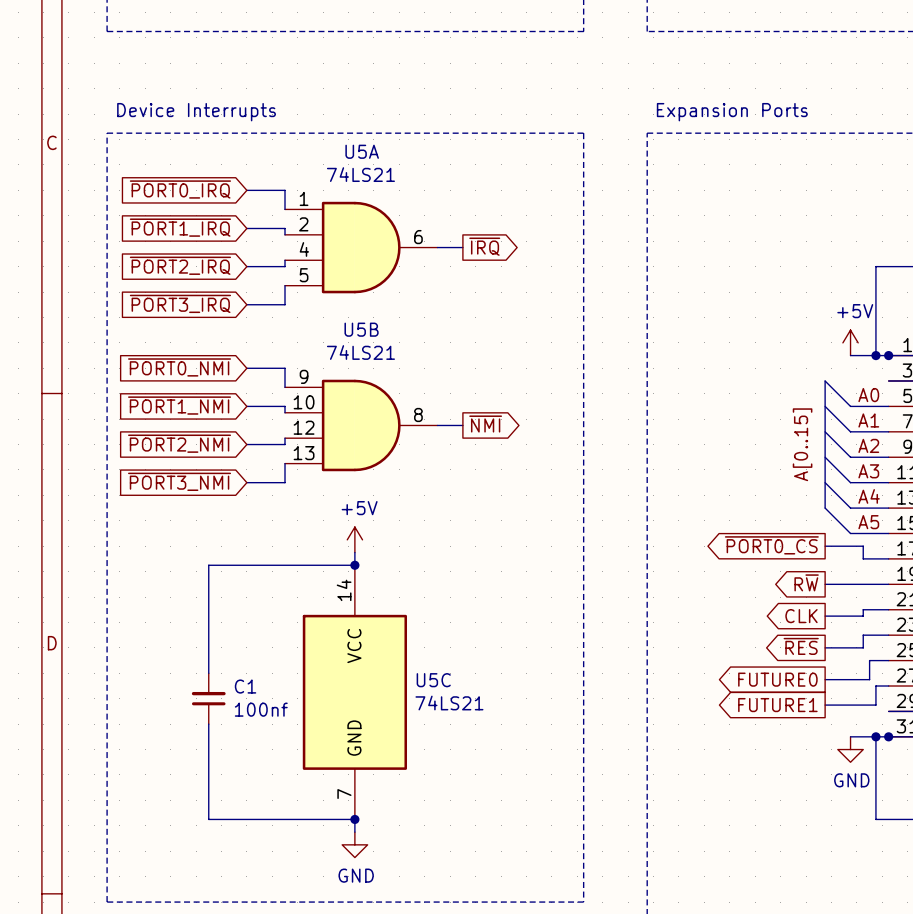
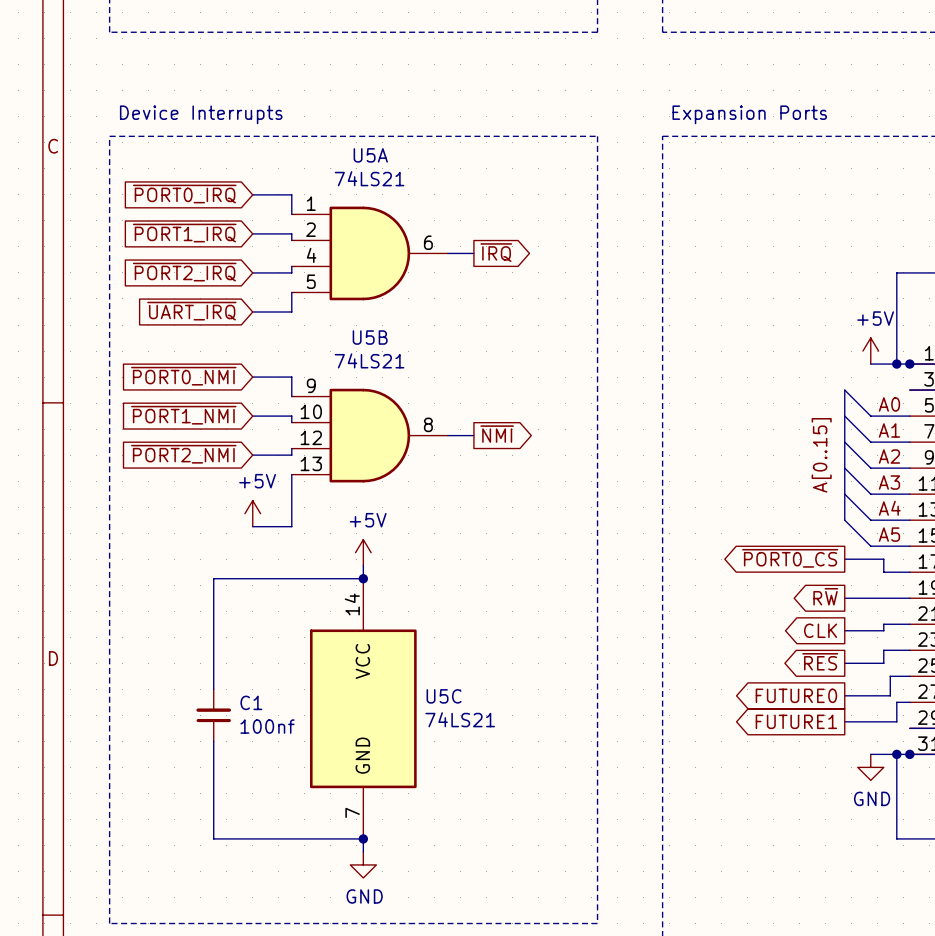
global label: ~{PORT3_IRQ} (180, 303) -> ~{UART_IRQ} (191, 311)
global label: ~{PORT3_NMI} (179, 481) -> none
wire: (246, 482) (285, 482) -> (252, 526) (291, 526) (291, 494)
power symbol: none -> +5V (252, 513)

